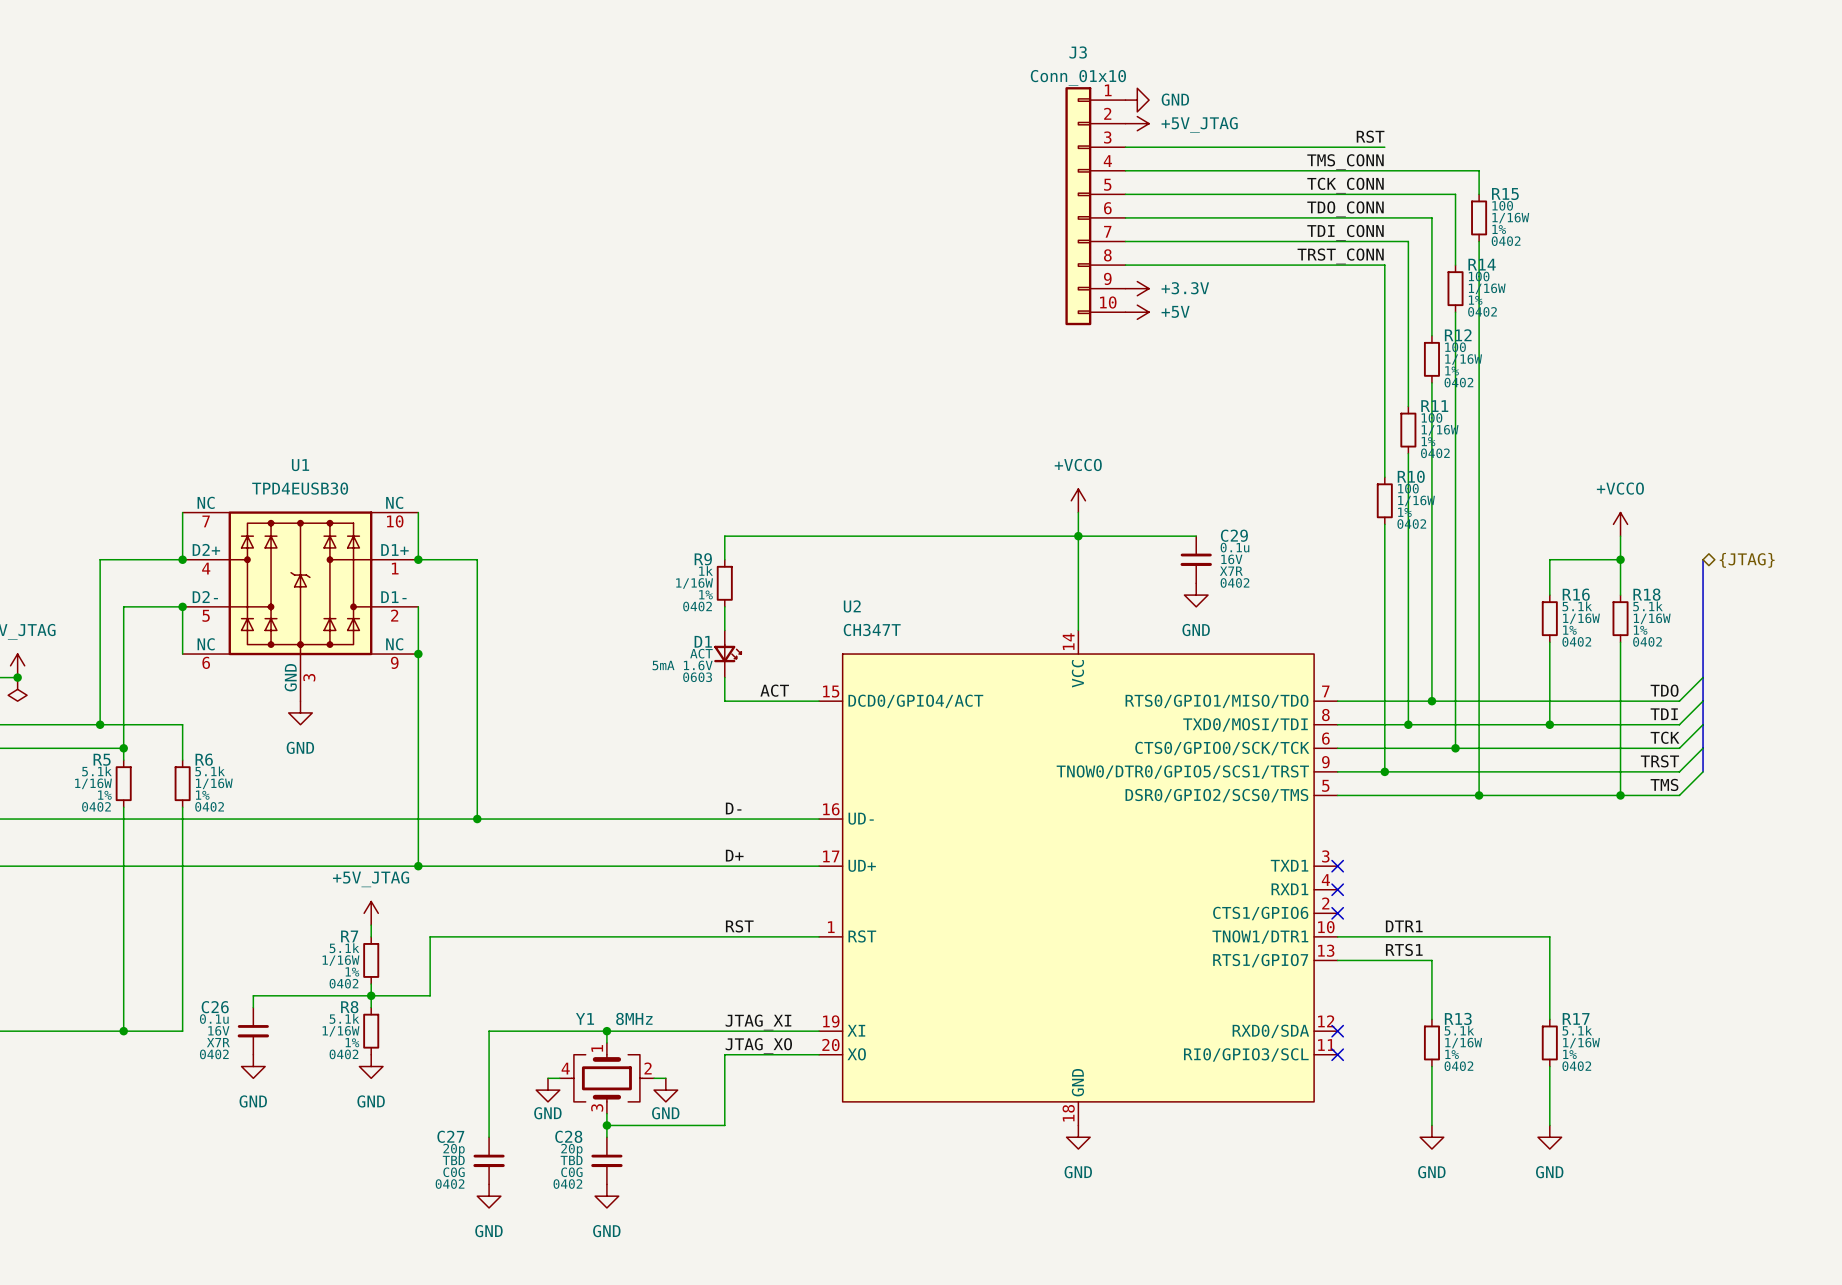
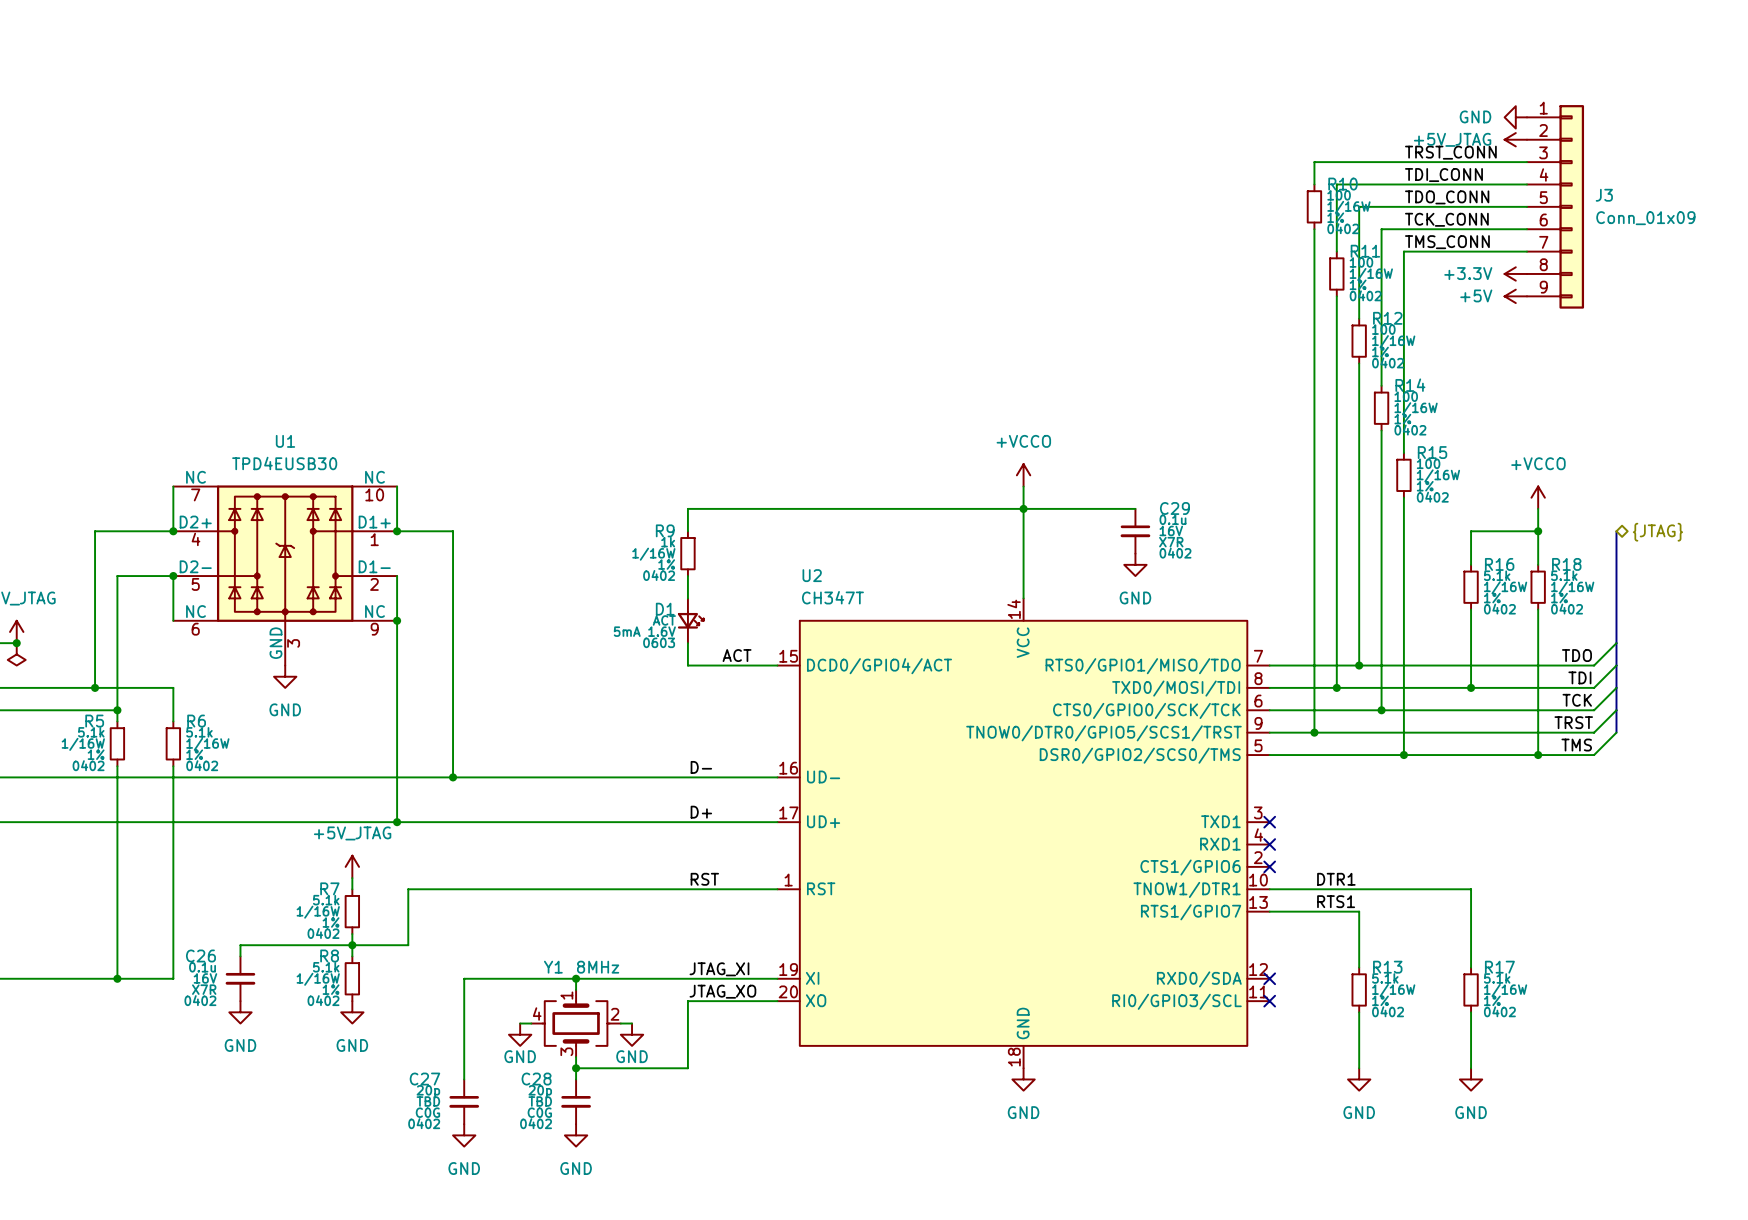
J3 name position: J3 (1078, 52) -> J3 (1604, 195)
J3 value: Conn_01x10 (1078, 77) -> Conn_01x09 (1645, 218)
J3 symbol: [1065, 87, 1126, 326] -> [1526, 105, 1585, 309]
power symbol: GND (1137, 100) -> none
power symbol: +5V_JTAG (1137, 123) -> none
power symbol: none -> GND (1515, 117)
label: RST (1370, 136) -> none
wire: (1125, 147) (1384, 147) -> none
power symbol: none -> +5V_JTAG (1515, 139)
label position: TMS_CONN (1345, 162) -> TMS_CONN (1447, 242)
wire: (1125, 170) (1384, 170) -> (1314, 184) (1314, 162)
wire: (1479, 170) (1479, 194) -> (1403, 162) (1526, 162)
label position: TCK_CONN (1345, 185) -> TCK_CONN (1446, 219)
wire: (1125, 194) (1408, 194) -> (1336, 229) (1336, 184)
wire: (1455, 194) (1455, 241) -> (1381, 184) (1526, 184)
label position: TDO_CONN (1345, 209) -> TDO_CONN (1447, 197)
wire: (1125, 217) (1431, 217) -> (1526, 206) (1359, 206)
R15 position: (1479, 217) -> (1403, 475)
label position: TDI_CONN (1345, 232) -> TDI_CONN (1443, 175)
wire: (1125, 241) (1408, 241) -> none
wire: none -> (1381, 229) (1526, 229)
wire: (1479, 241) (1479, 265) -> (1526, 251) (1403, 251)
label position: TRST_CONN (1340, 256) -> TRST_CONN (1450, 152)
wire: (1125, 265) (1384, 265) -> (1314, 229) (1314, 251)
wire: (1408, 265) (1408, 312) -> (1381, 251) (1381, 296)
power symbol: +3.3V (1137, 288) -> none
R14 position: (1455, 288) -> (1381, 408)
power symbol: none -> +3.3V (1515, 273)
power symbol: +5V (1137, 312) -> none
power symbol: none -> +5V (1515, 296)
wire: (1455, 406) (1455, 453) -> (1336, 385) (1336, 430)
R11 position: (1408, 430) -> (1336, 273)
wire: (1479, 477) (1479, 524) -> (1314, 452) (1314, 497)
R10 position: (1384, 500) -> (1314, 206)

